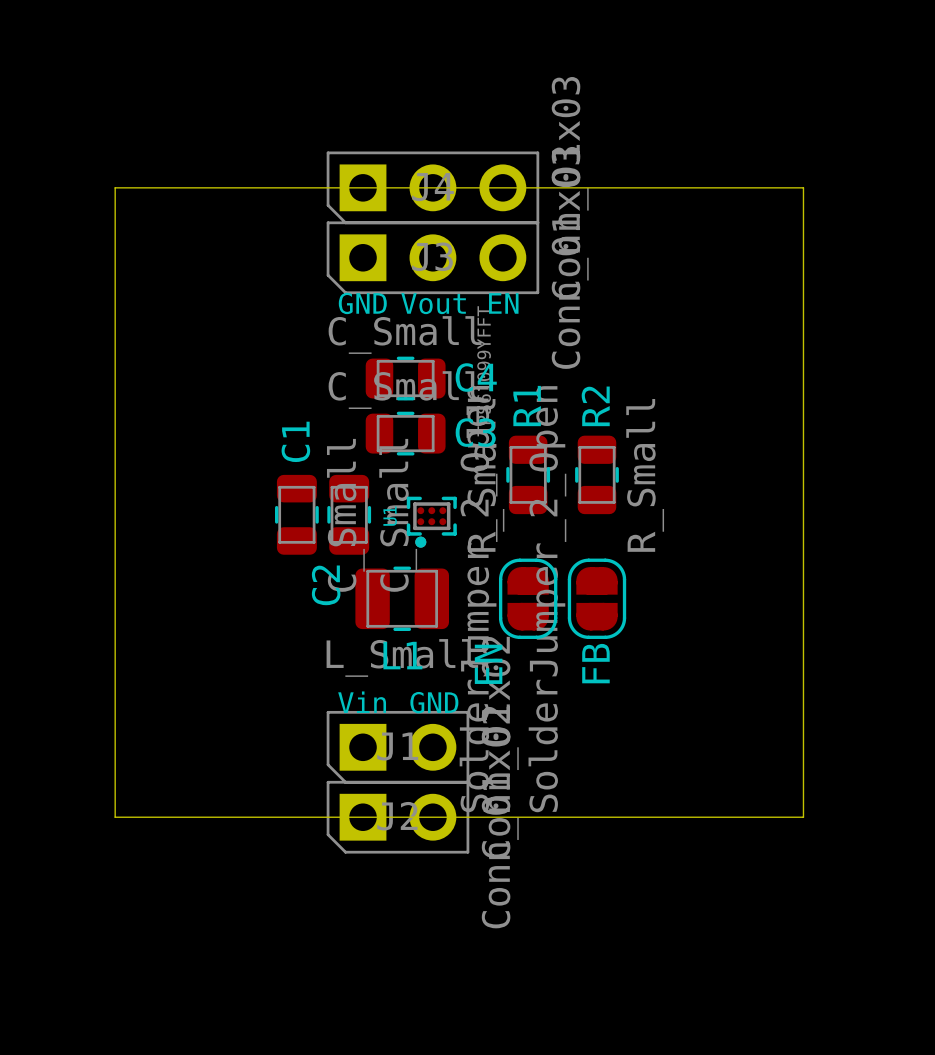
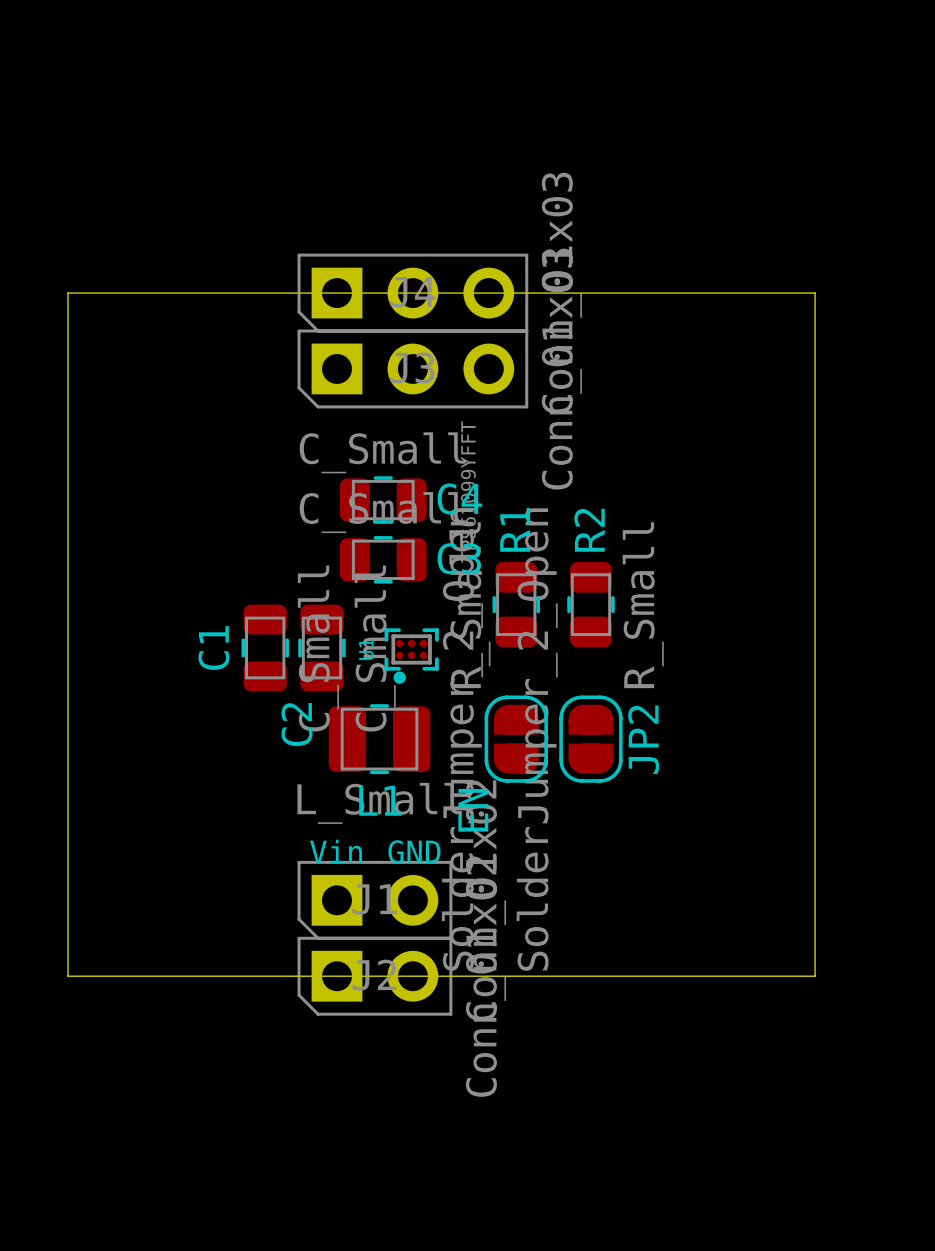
text: GND (362, 303) -> none
text: Vout (433, 303) -> none
text: EN (503, 303) -> none
C1 name position: C1 (295, 441) -> C1 (213, 647)
JP2 name: none -> JP2 (643, 739)
JP2 text: FB (595, 663) -> none

